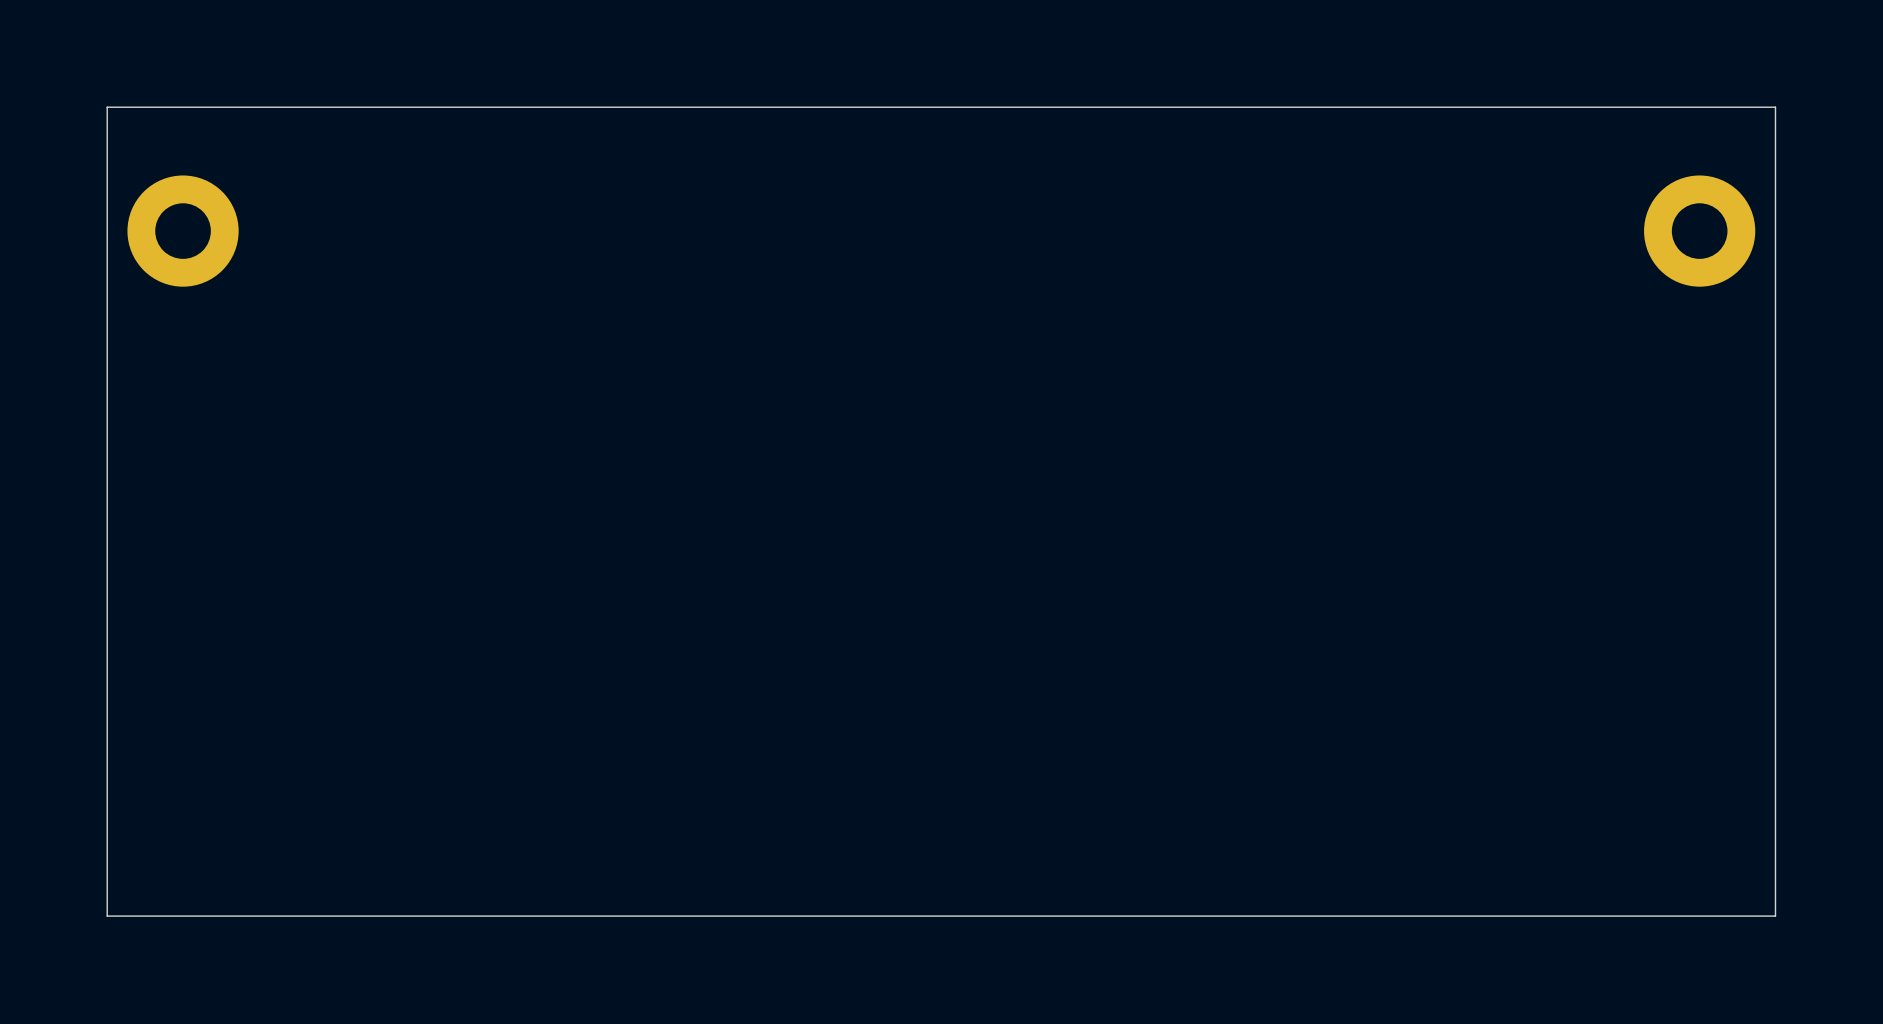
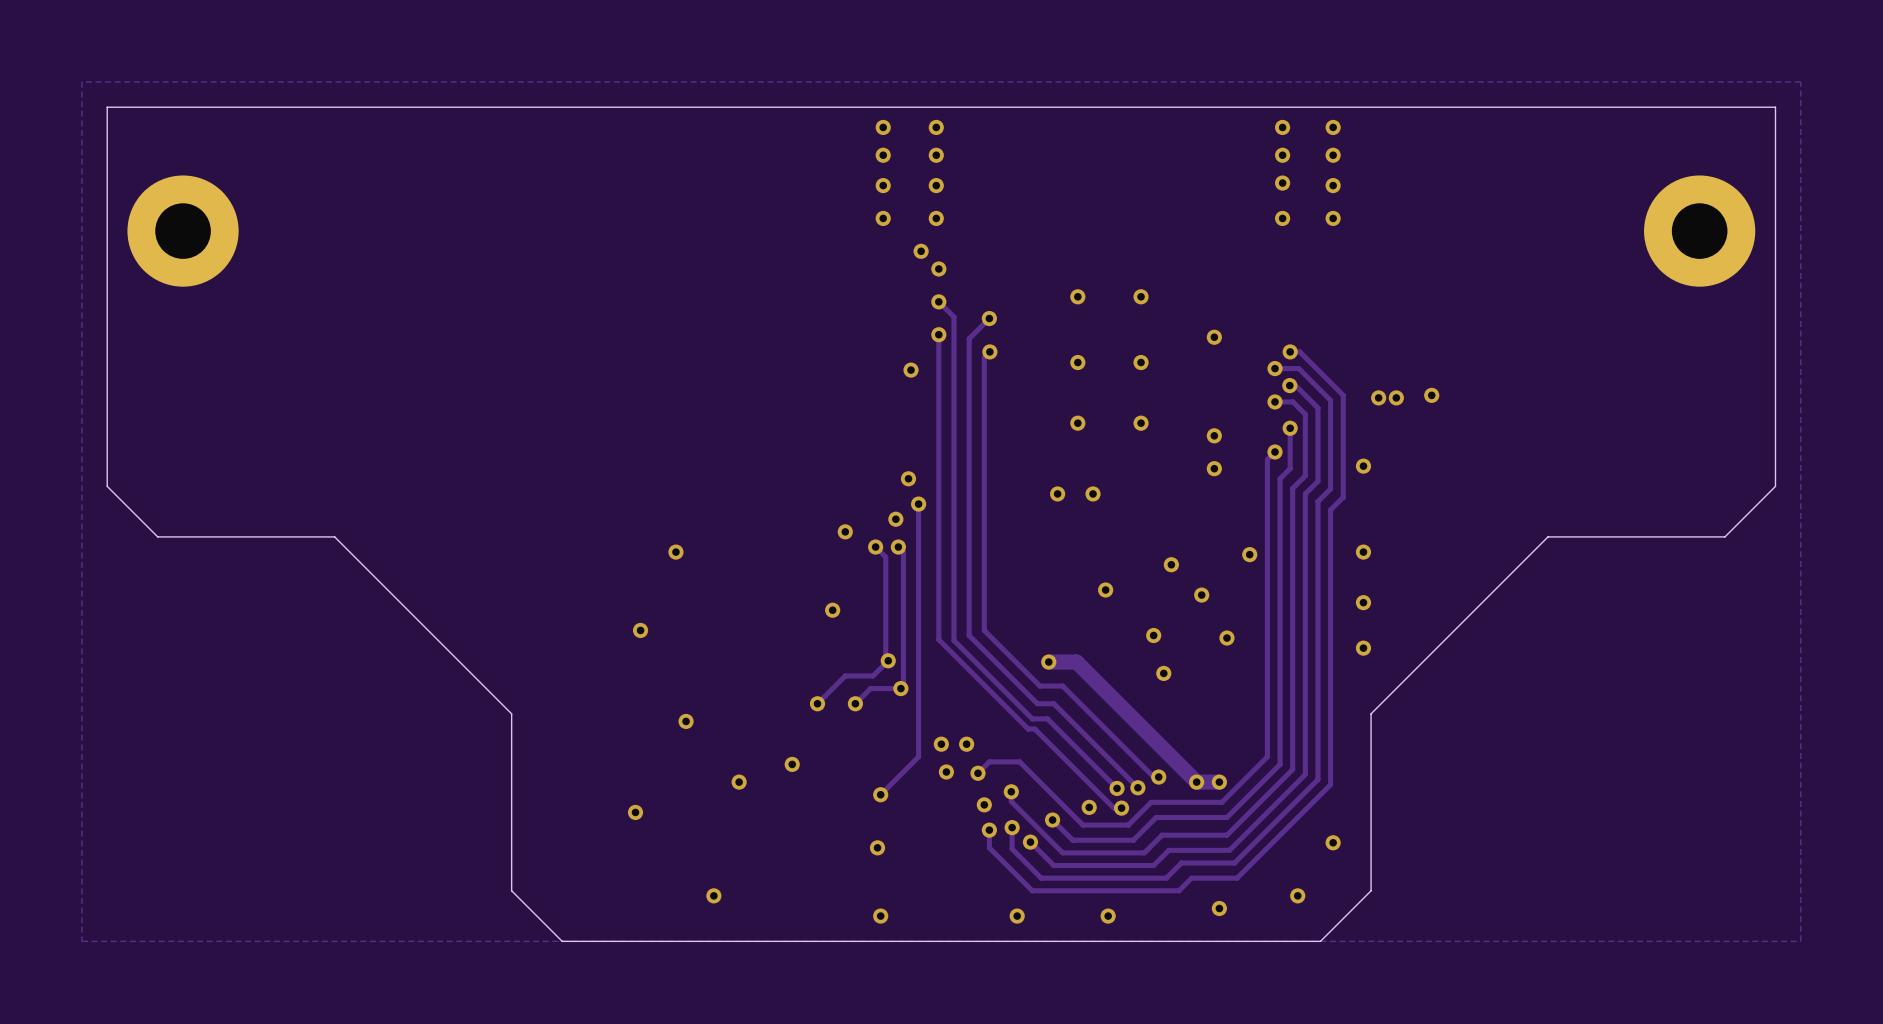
zone outline: none -> (1800, 81) (81, 81) (81, 941) (1800, 941) (1800, 81)
via: none -> (883, 127)
via: none -> (936, 127)
via: none -> (1282, 127)
via: none -> (1333, 127)
via: none -> (883, 155)
via: none -> (936, 155)
via: none -> (1282, 155)
via: none -> (1333, 155)
via: none -> (1282, 183)
via: none -> (883, 185)
via: none -> (936, 185)
via: none -> (1333, 185)
via: none -> (883, 218)
via: none -> (936, 218)
via: none -> (1282, 218)
via: none -> (1333, 218)
via: none -> (921, 251)
via: none -> (938, 268)
via: none -> (1077, 296)
via: none -> (1141, 296)
track: none -> (938, 301) (953, 317) (953, 640) (1032, 718) (1047, 718) (1117, 788)
via: none -> (938, 301)
track: none -> (989, 318) (969, 338) (969, 635) (1037, 703) (1053, 703) (1137, 787)
via: none -> (989, 318)
track: none -> (938, 334) (938, 639) (1028, 729) (1034, 729) (1113, 808) (1121, 808)
via: none -> (938, 334)
via: none -> (1214, 337)
track: none -> (989, 351) (984, 357) (984, 630) (1039, 686) (1062, 686) (1153, 777) (1158, 777)
via: none -> (989, 351)
track: none -> (1290, 351) (1299, 351) (1343, 395) (1343, 497) (1330, 509) (1330, 784) (1237, 878) (1191, 878) (1178, 890) (1032, 890) (989, 847) (989, 830)
via: none -> (1290, 351)
via: none -> (1077, 362)
via: none -> (1141, 362)
track: none -> (1275, 368) (1298, 368) (1330, 400) (1330, 488) (1317, 501) (1317, 779) (1234, 862) (1181, 862) (1166, 878) (1041, 878) (1012, 849) (1012, 827)
via: none -> (1275, 368)
via: none -> (911, 370)
track: none -> (1289, 385) (1295, 385) (1317, 408) (1317, 481) (1305, 493) (1305, 774) (1229, 850) (1168, 850) (1153, 865) (1053, 865) (1030, 842)
via: none -> (1289, 385)
via: none -> (1431, 395)
via: none -> (1378, 397)
via: none -> (1396, 397)
track: none -> (1275, 401) (1292, 401) (1305, 414) (1305, 475) (1292, 488) (1292, 769) (1226, 835) (1162, 835) (1144, 852) (1062, 852) (1011, 801) (1011, 791)
via: none -> (1275, 401)
via: none -> (1077, 423)
via: none -> (1141, 423)
track: none -> (1290, 428) (1290, 468) (1280, 478) (1280, 764) (1226, 817) (1156, 817) (1133, 840) (1072, 840) (1052, 820)
via: none -> (1290, 428)
via: none -> (1214, 435)
track: none -> (1275, 451) (1267, 459) (1267, 756) (1221, 802) (1151, 802) (1128, 825) (1082, 825) (1019, 761) (989, 761) (978, 773)
via: none -> (1275, 451)
via: none -> (1363, 466)
via: none -> (1214, 468)
via: none -> (908, 478)
board edge: (1775, 486) (1775, 916) (107, 916) (107, 486) -> (1775, 486) (1724, 536) (1547, 536) (1371, 713) (1371, 890) (1320, 941) (562, 941) (511, 890) (511, 713) (334, 536) (157, 536) (107, 486)
via: none -> (1057, 493)
via: none -> (1093, 493)
track: none -> (918, 504) (918, 756) (880, 794)
via: none -> (918, 504)
via: none -> (895, 519)
via: none -> (845, 531)
track: none -> (875, 547) (885, 557) (885, 658) (888, 660) (873, 675) (845, 675) (817, 703)
via: none -> (875, 547)
track: none -> (898, 547) (903, 552) (903, 686) (900, 688) (870, 688) (855, 703)
via: none -> (898, 547)
via: none -> (675, 552)
via: none -> (1363, 552)
via: none -> (1249, 554)
via: none -> (1171, 564)
via: none -> (1105, 590)
via: none -> (1201, 595)
via: none -> (1363, 602)
via: none -> (832, 610)
via: none -> (640, 630)
via: none -> (1153, 635)
via: none -> (1226, 638)
via: none -> (1363, 648)
via: none -> (888, 660)
track: none -> (1048, 662) (1076, 662) (1196, 782) (1219, 782)
via: none -> (1048, 662)
via: none -> (1163, 673)
via: none -> (900, 688)
via: none -> (817, 703)
via: none -> (855, 703)
via: none -> (686, 721)
via: none -> (941, 744)
via: none -> (966, 744)
via: none -> (792, 764)
via: none -> (946, 772)
via: none -> (978, 773)
via: none -> (1158, 777)
via: none -> (739, 782)
via: none -> (1196, 782)
via: none -> (1219, 782)
via: none -> (1137, 787)
via: none -> (1117, 788)
via: none -> (1011, 791)
via: none -> (880, 794)
via: none -> (984, 804)
via: none -> (1089, 807)
via: none -> (1121, 808)
via: none -> (635, 812)
via: none -> (1052, 820)
via: none -> (1012, 827)
via: none -> (989, 830)
via: none -> (1030, 842)
via: none -> (1333, 842)
via: none -> (877, 847)
via: none -> (713, 895)
via: none -> (1297, 895)
via: none -> (1219, 908)
via: none -> (880, 916)
via: none -> (1017, 916)
via: none -> (1108, 916)

